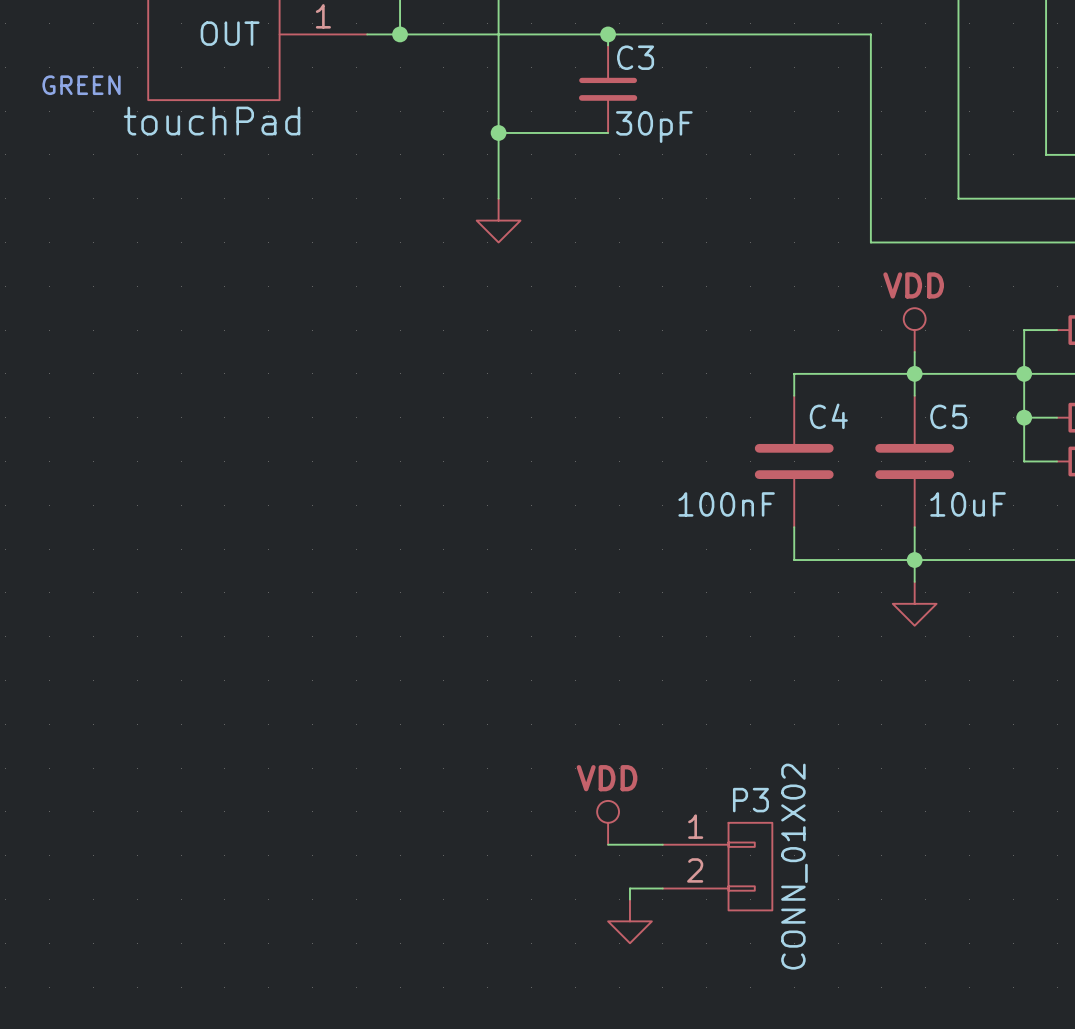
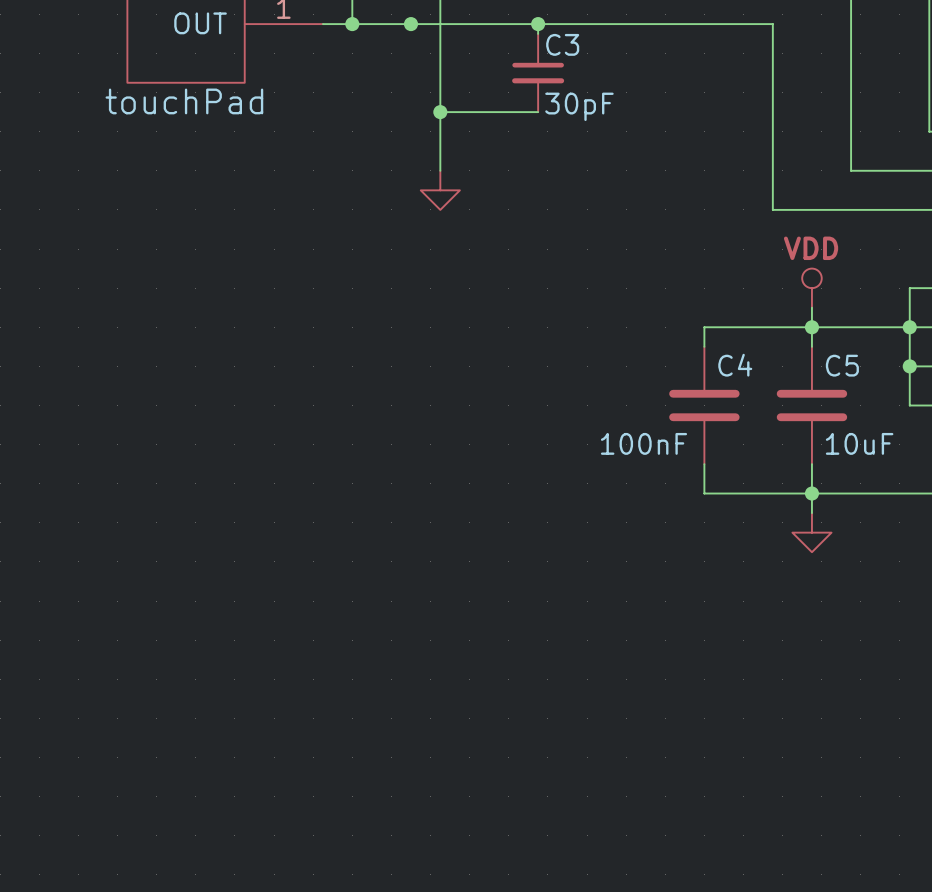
junction: none -> (410, 24)
text: GREEN (81, 85) -> none
power symbol: (608, 822) -> none
wire: (608, 844) (662, 844) -> none
P3: CONN_01X02 (717, 866) -> none
wire: (662, 888) (629, 888) (629, 899) -> none
power symbol: (629, 921) -> none

